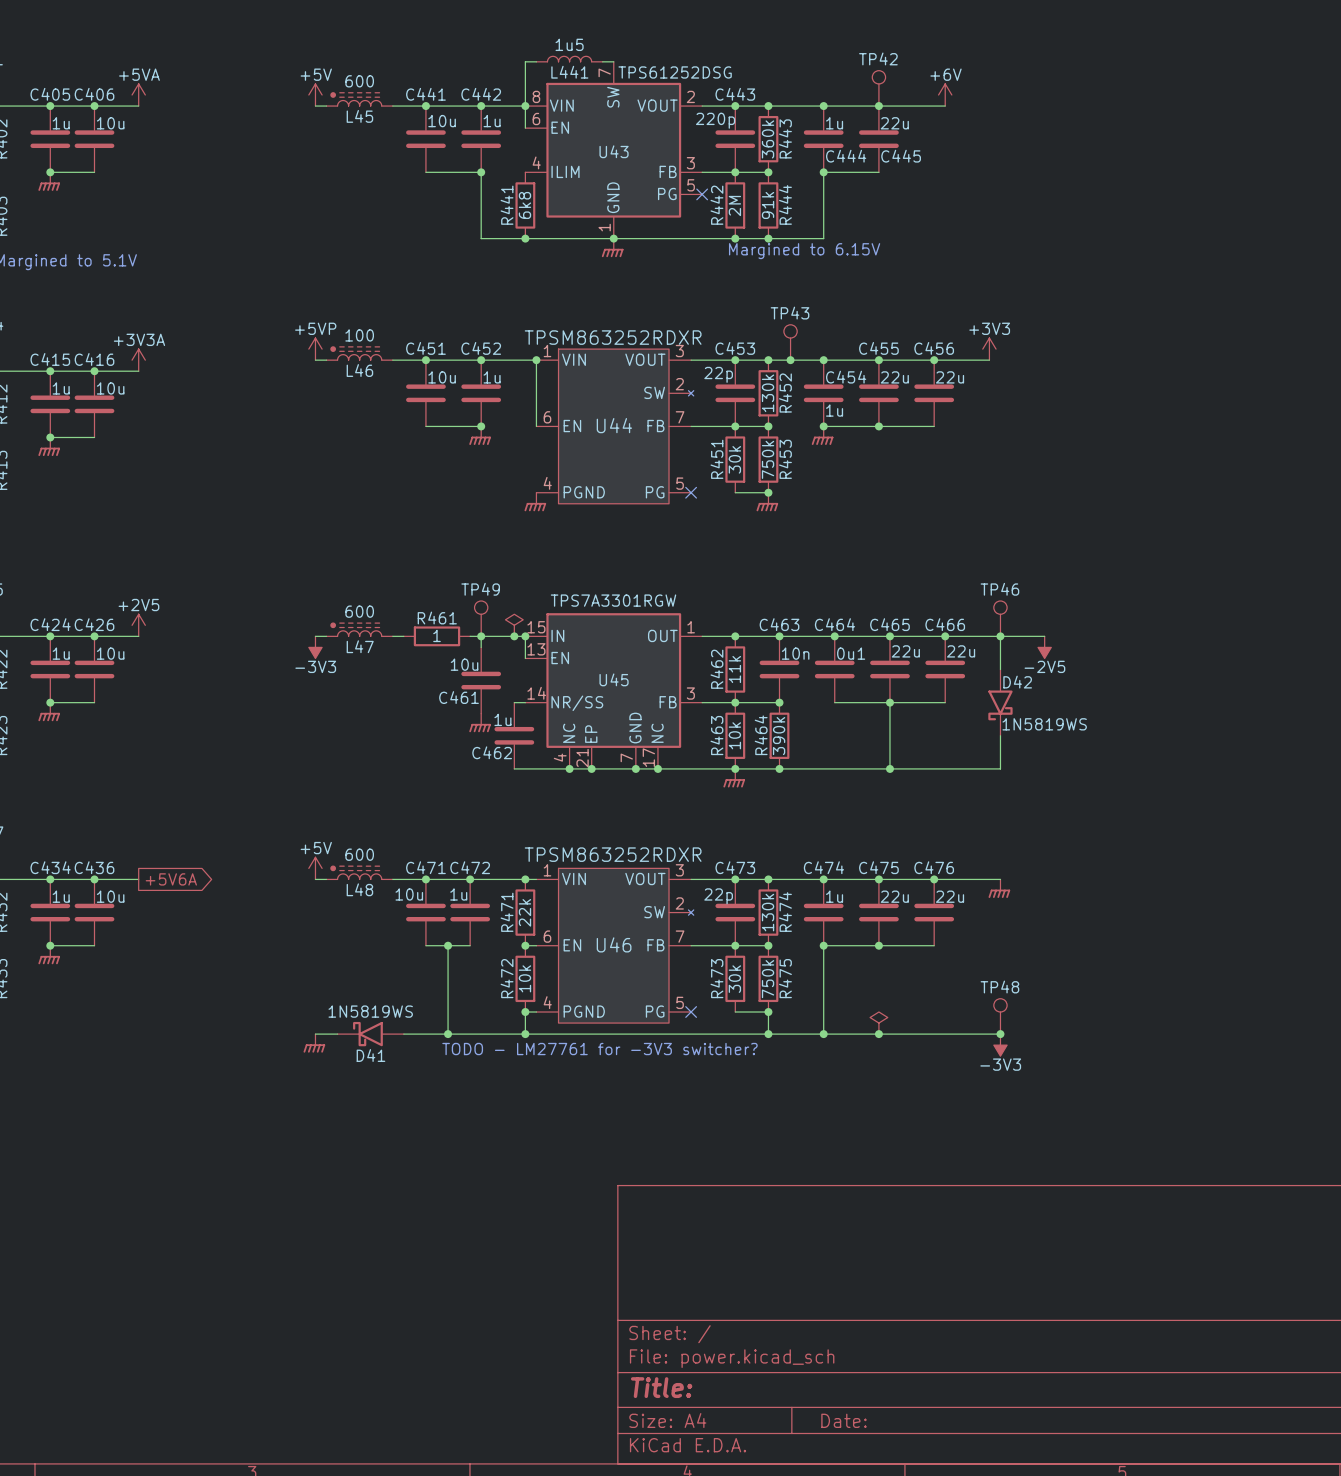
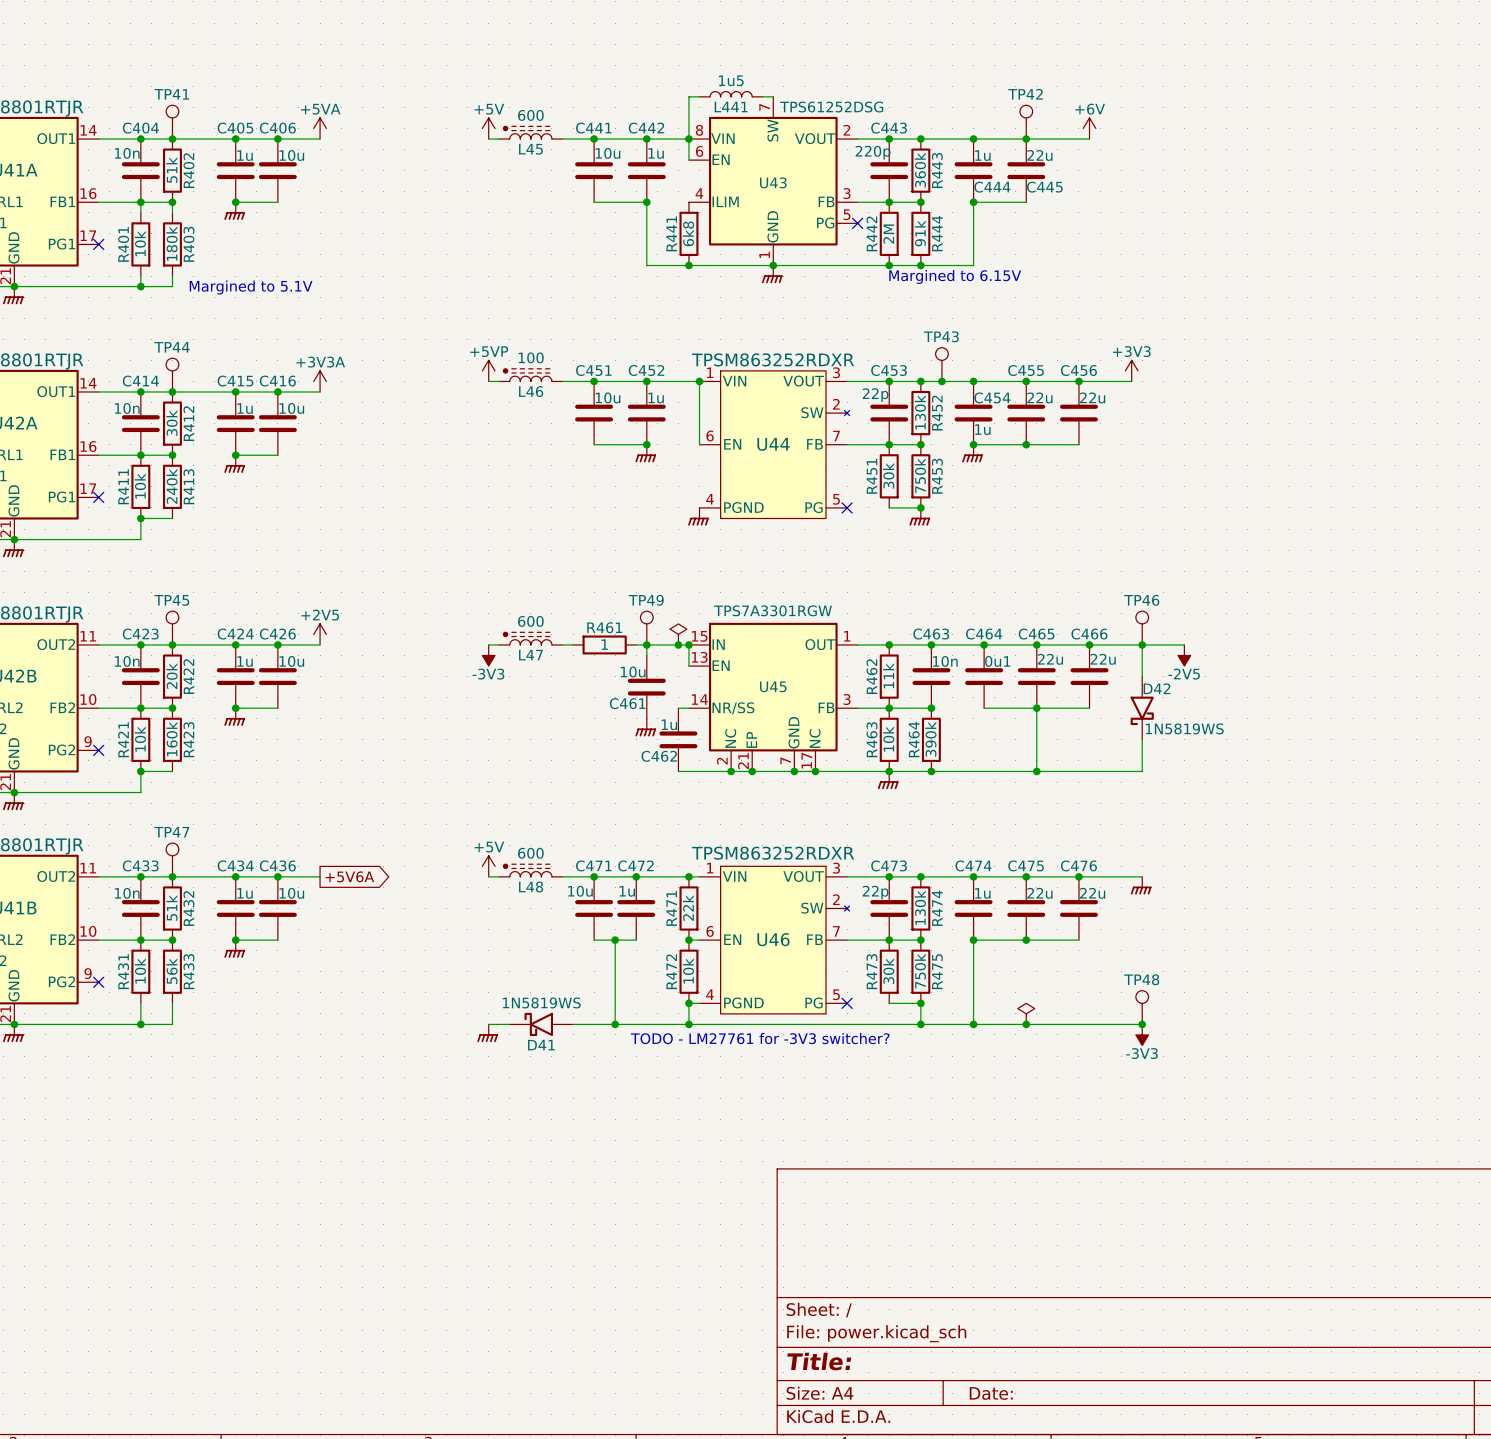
U45 pin number: 4 (560, 757) -> 2 (722, 761)

